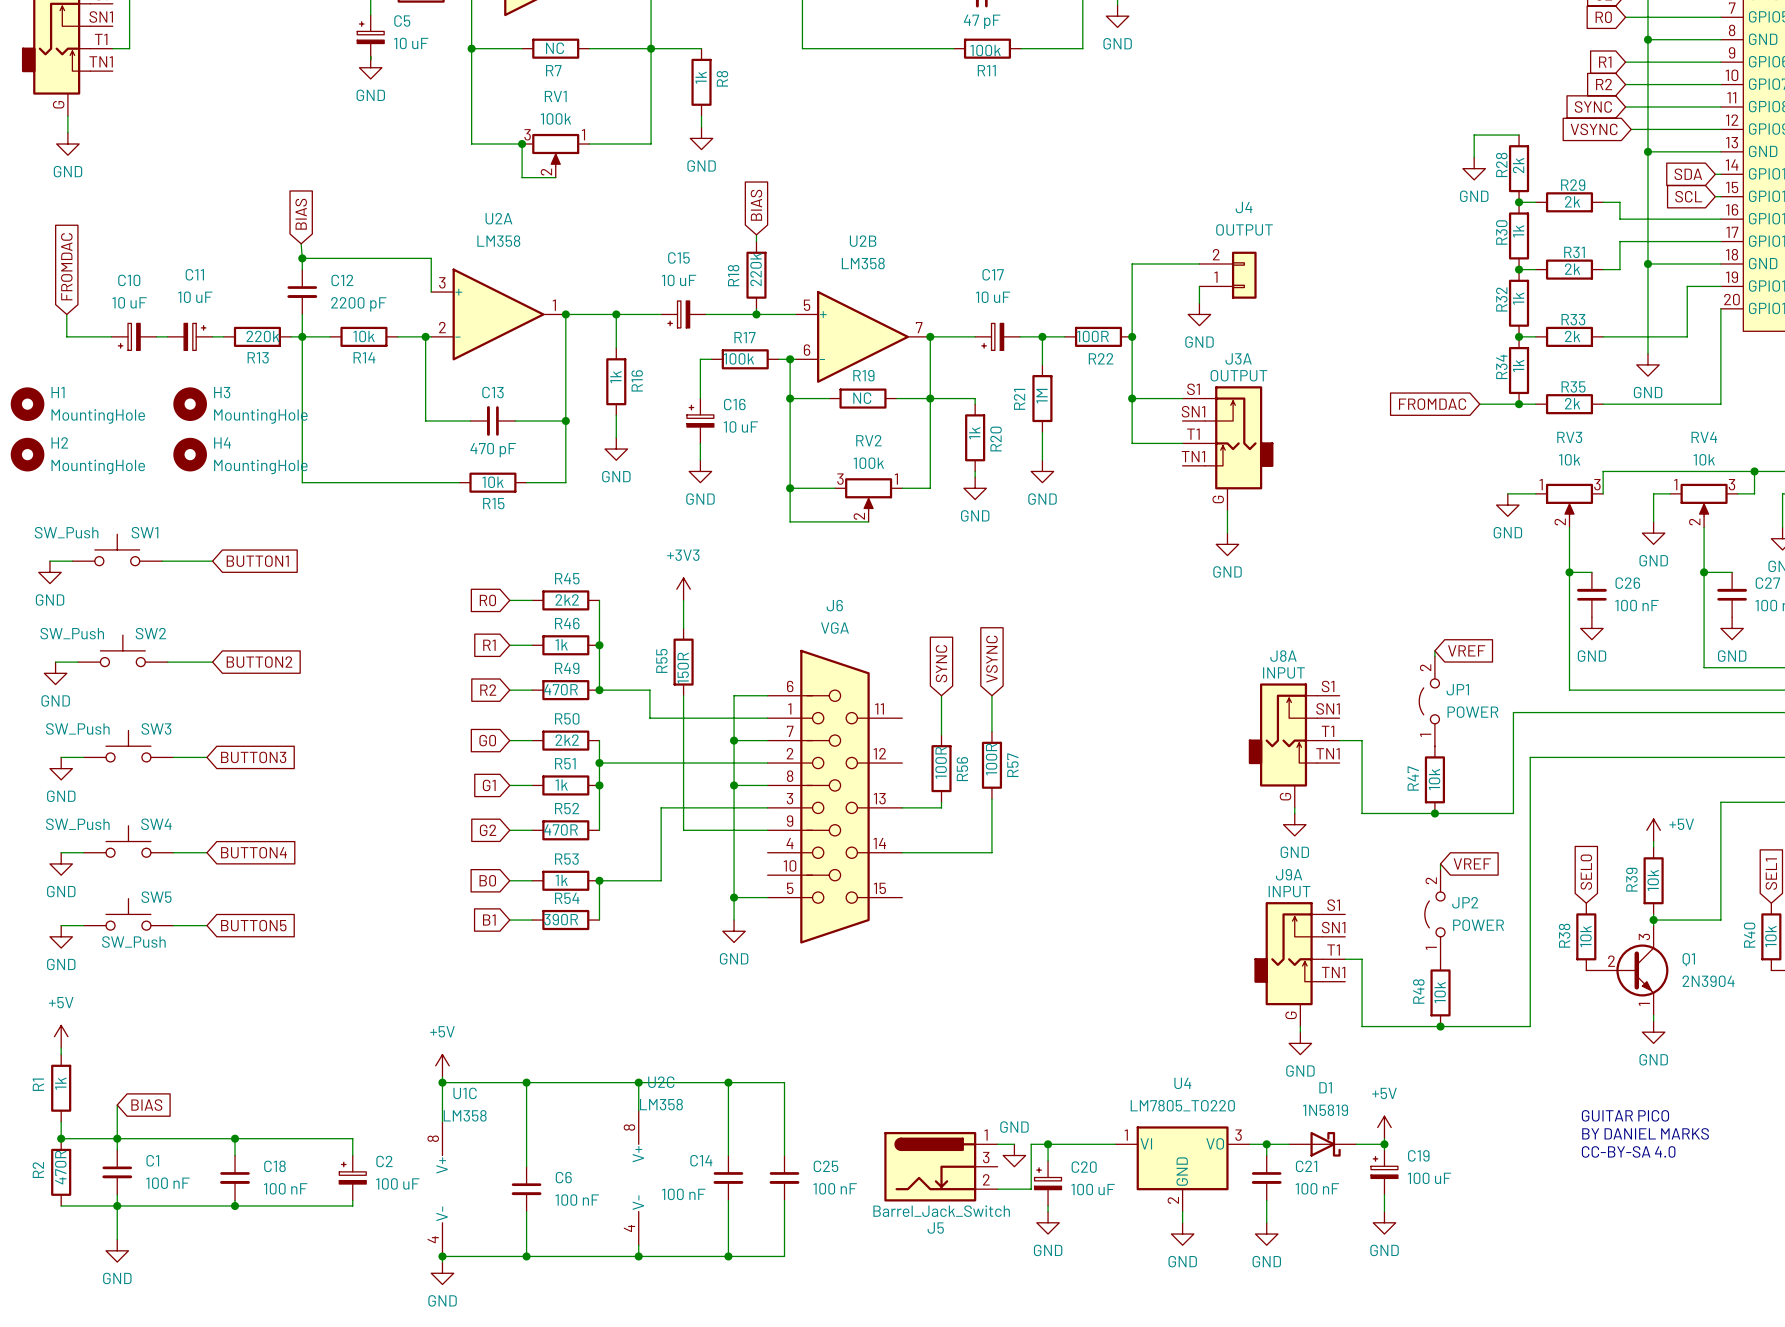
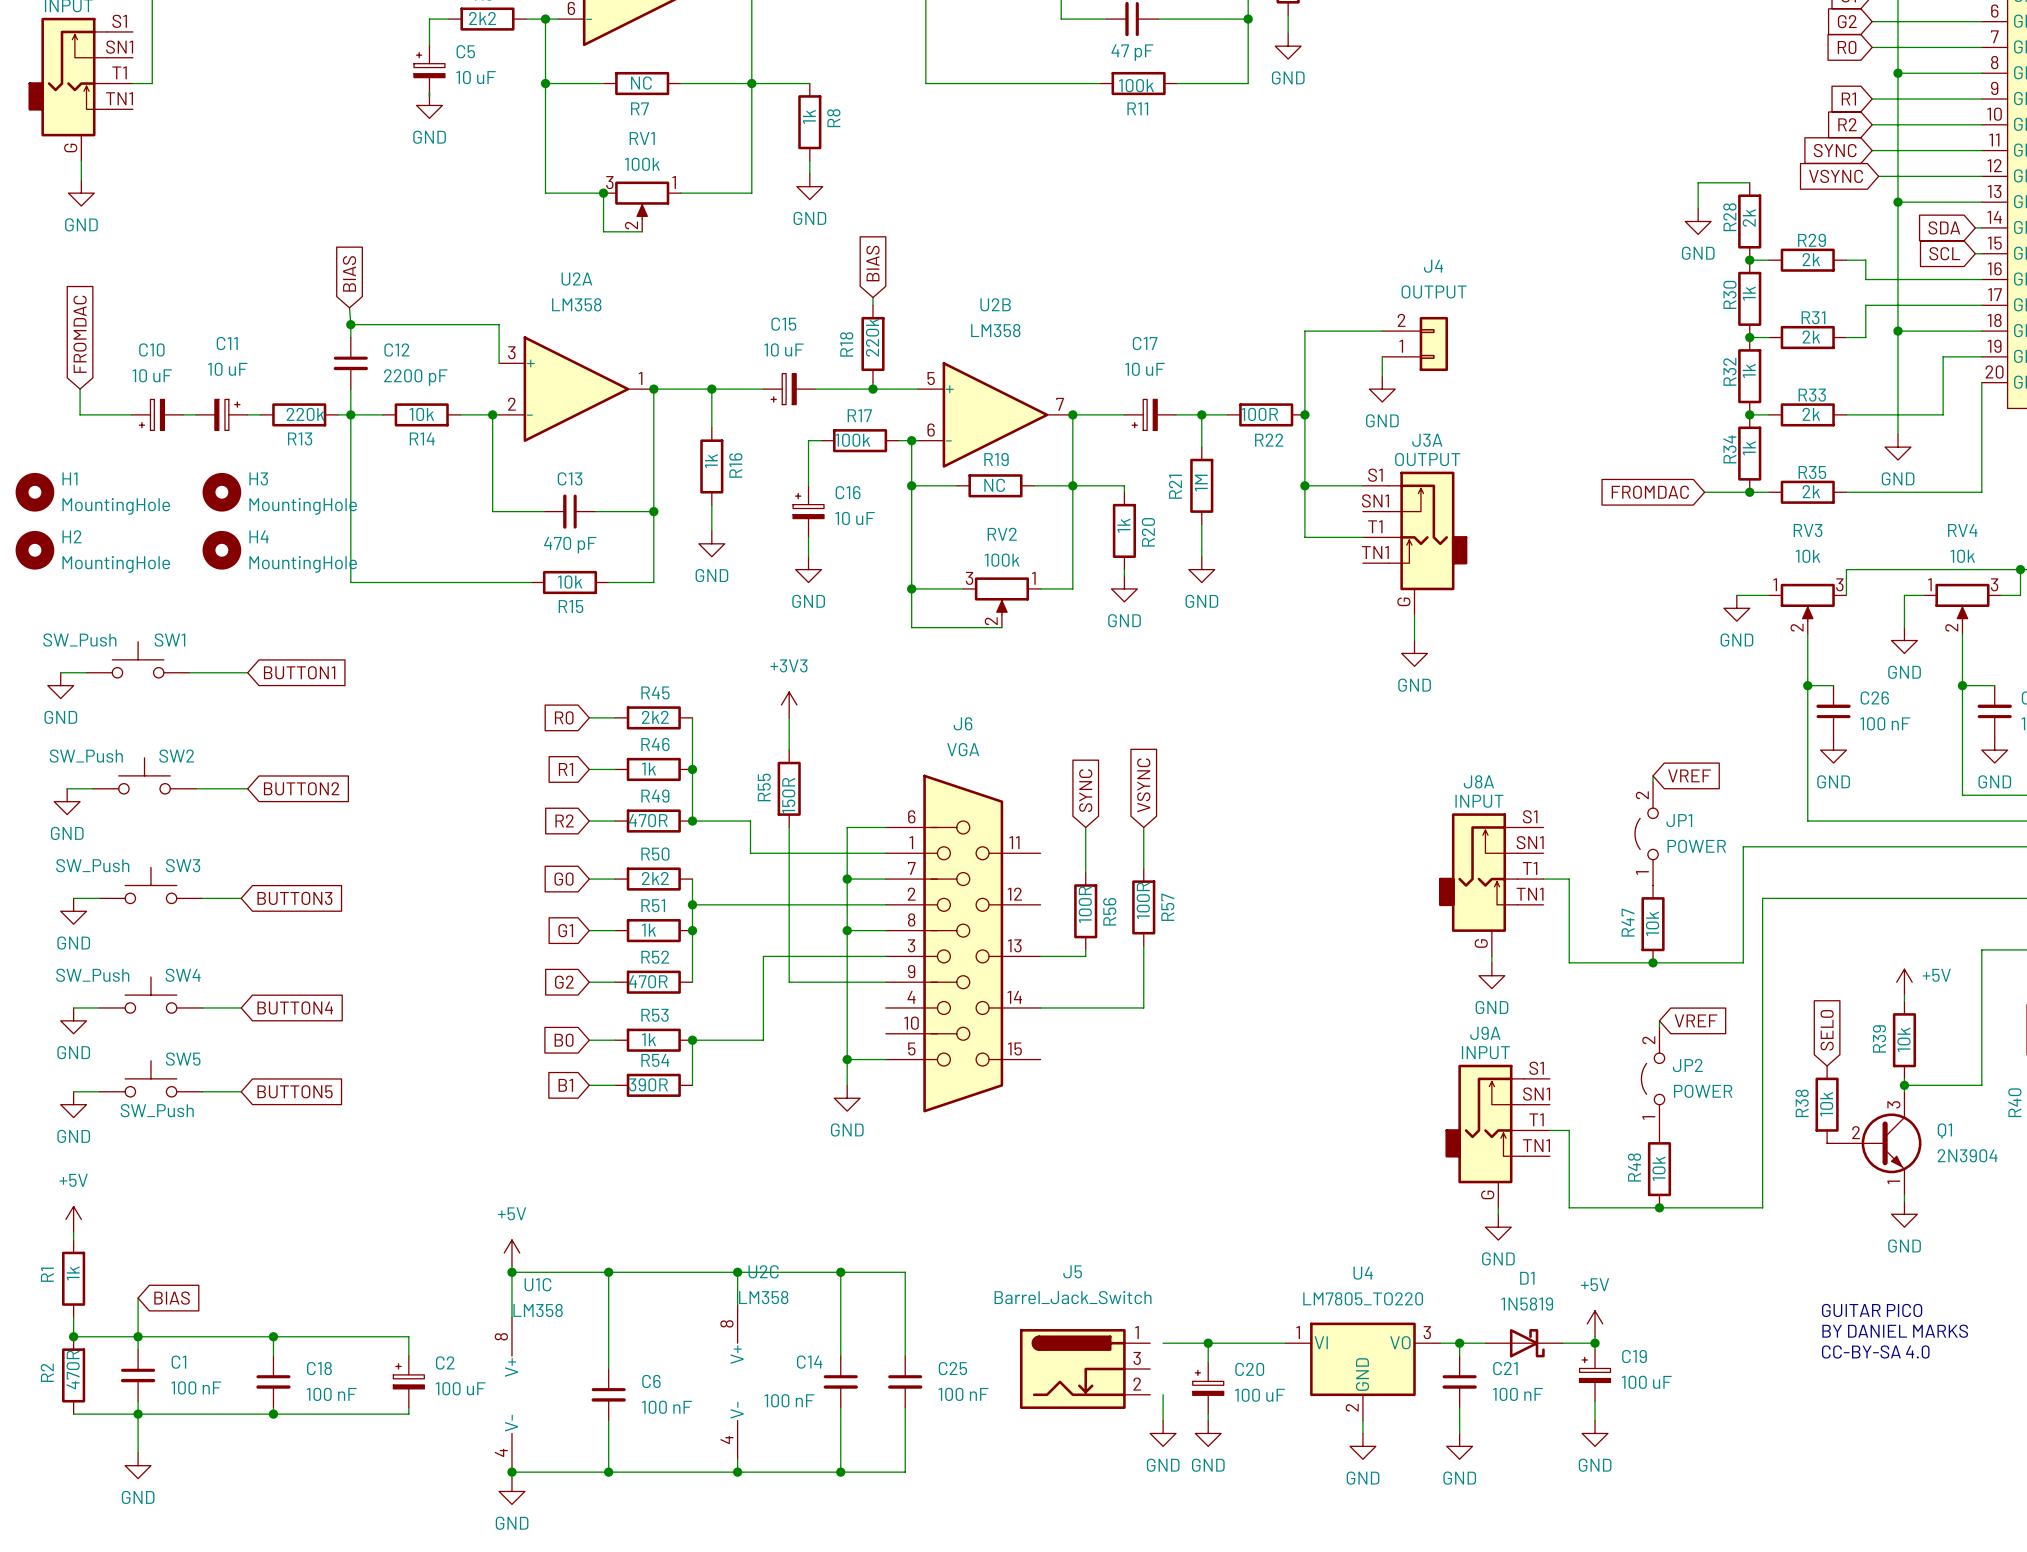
power symbol text position: GND (1014, 1127) -> GND (1163, 1465)
wire: (997, 1144) (1008, 1144) -> none
wire: (1031, 1144) (1031, 1189) (997, 1189) -> (1188, 1343) (1169, 1343)
power symbol position: GND (1014, 1155) -> GND (1163, 1433)
wire: none -> (1163, 1394) (1163, 1420)
J5 value position: Barrel_Jack_Switch (941, 1211) -> Barrel_Jack_Switch (1073, 1297)
J5 name position: J5 (935, 1228) -> J5 (1072, 1271)

